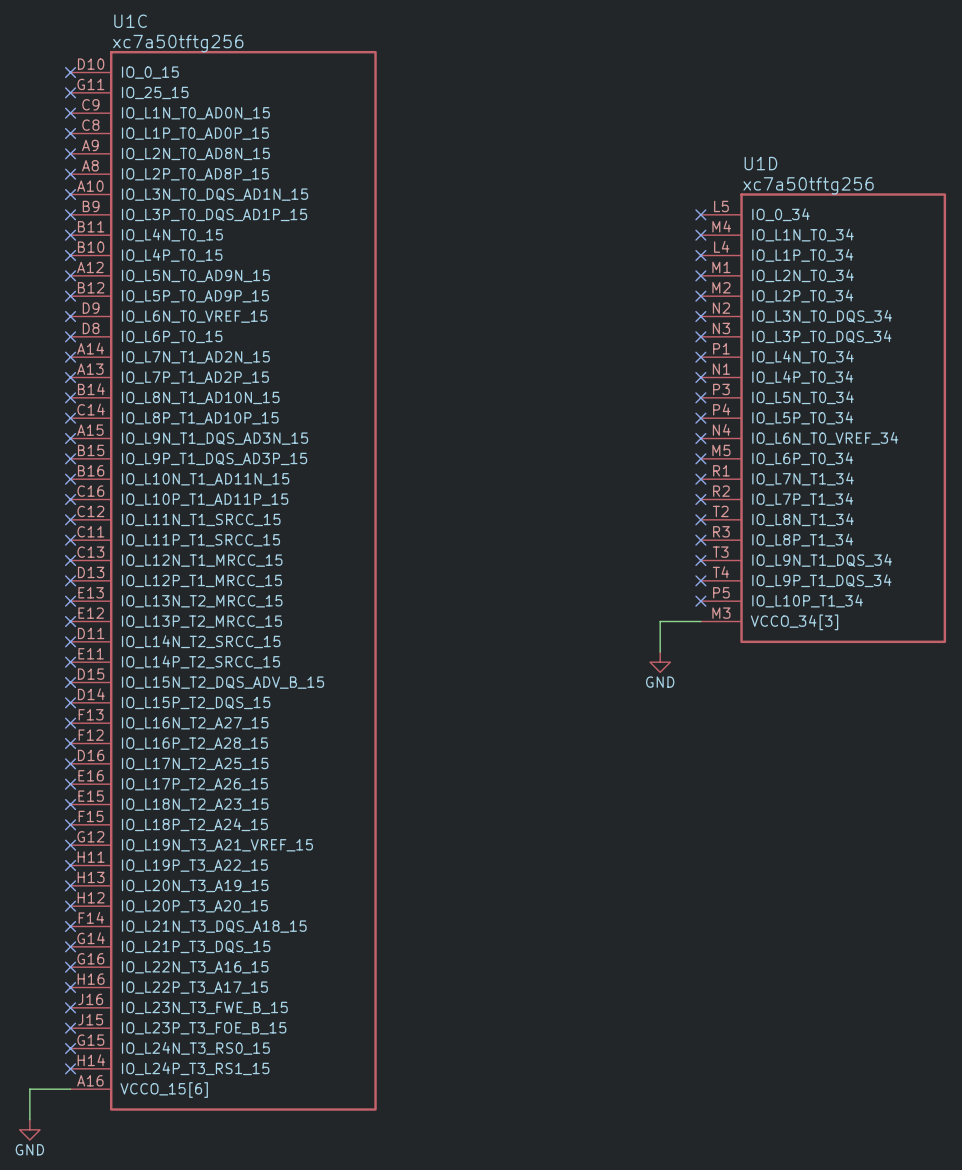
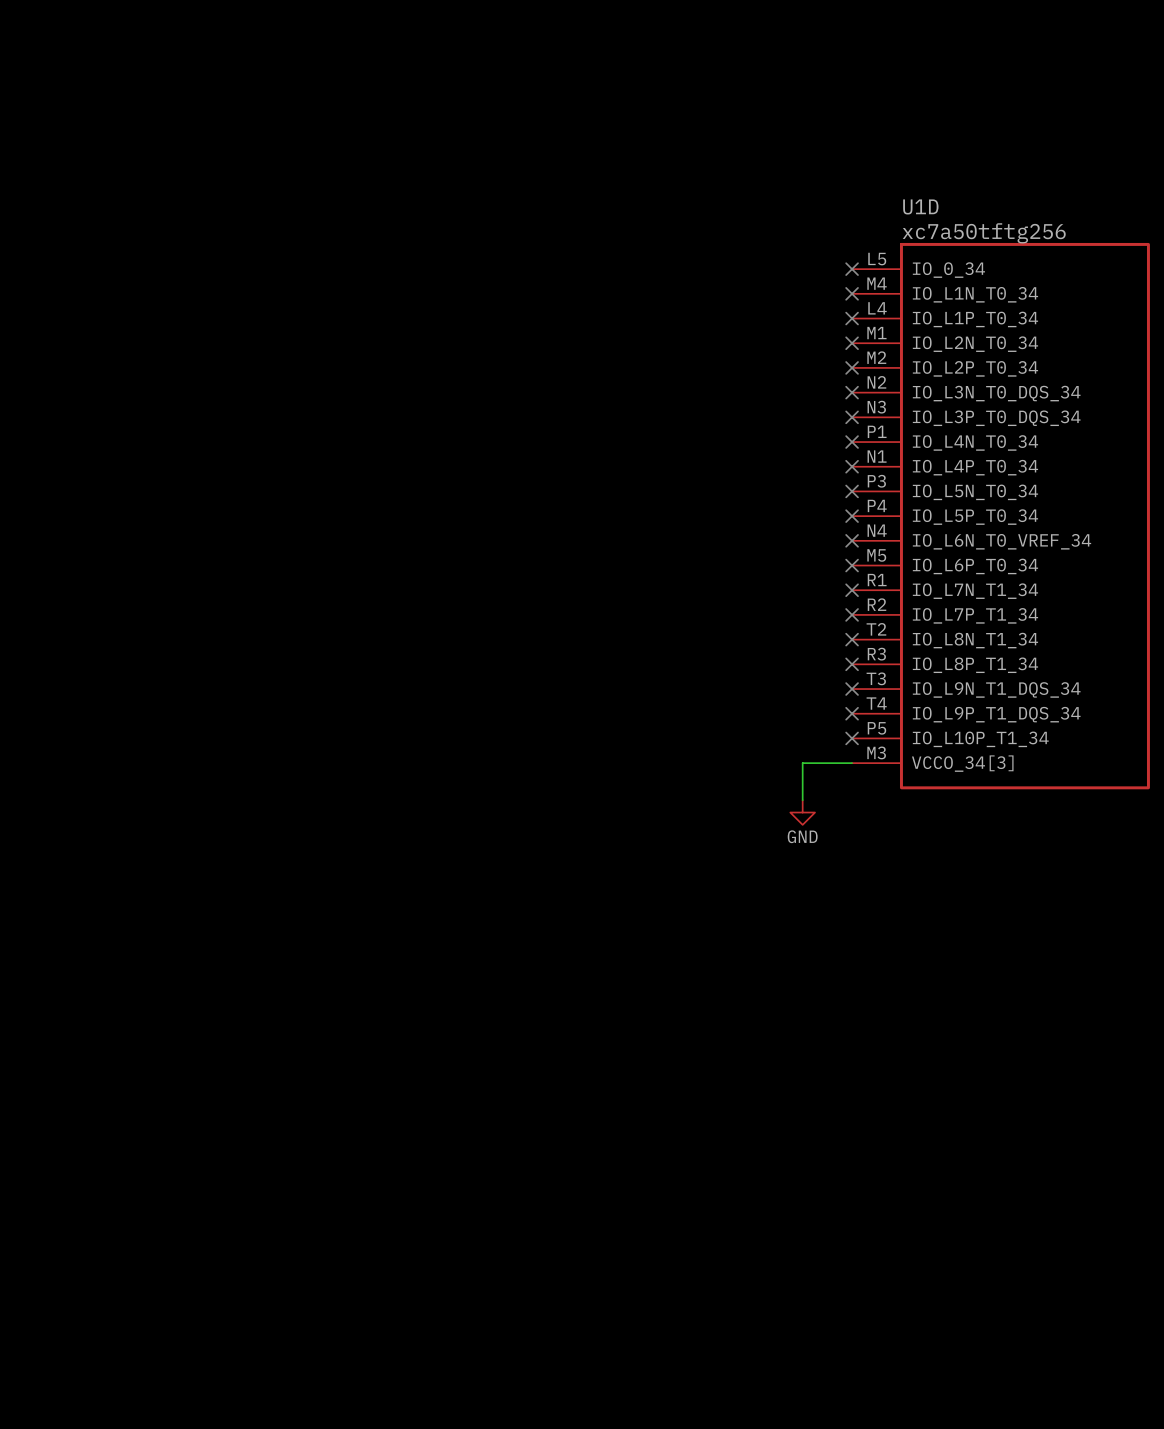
no-connect mark: (70, 72) -> none
no-connect mark: (70, 92) -> none
no-connect mark: (70, 113) -> none
no-connect mark: (70, 133) -> none
no-connect mark: (70, 153) -> none
no-connect mark: (70, 174) -> none
no-connect mark: (70, 194) -> none
no-connect mark: (70, 214) -> none
no-connect mark: (70, 235) -> none
no-connect mark: (70, 255) -> none
no-connect mark: (70, 275) -> none
no-connect mark: (70, 296) -> none
no-connect mark: (70, 316) -> none
no-connect mark: (70, 336) -> none
no-connect mark: (70, 357) -> none
no-connect mark: (70, 377) -> none
no-connect mark: (70, 397) -> none
no-connect mark: (70, 418) -> none
no-connect mark: (70, 438) -> none
no-connect mark: (70, 458) -> none
no-connect mark: (70, 479) -> none
no-connect mark: (70, 499) -> none
no-connect mark: (70, 519) -> none
no-connect mark: (70, 540) -> none
no-connect mark: (70, 560) -> none
no-connect mark: (70, 580) -> none
U1C: xc7a50tftg256 (223, 580) -> none
no-connect mark: (70, 601) -> none
no-connect mark: (70, 621) -> none
no-connect mark: (70, 641) -> none
no-connect mark: (70, 662) -> none
no-connect mark: (70, 682) -> none
no-connect mark: (70, 702) -> none
no-connect mark: (70, 723) -> none
no-connect mark: (70, 743) -> none
no-connect mark: (70, 763) -> none
no-connect mark: (70, 784) -> none
no-connect mark: (70, 804) -> none
no-connect mark: (70, 824) -> none
no-connect mark: (70, 845) -> none
no-connect mark: (70, 865) -> none
no-connect mark: (70, 885) -> none
no-connect mark: (70, 906) -> none
no-connect mark: (70, 926) -> none
no-connect mark: (70, 946) -> none
no-connect mark: (70, 967) -> none
no-connect mark: (70, 987) -> none
no-connect mark: (70, 1007) -> none
no-connect mark: (70, 1028) -> none
no-connect mark: (70, 1048) -> none
no-connect mark: (70, 1068) -> none
wire: (70, 1089) (29, 1089) (29, 1119) -> none
power symbol: GND (29, 1129) -> none

